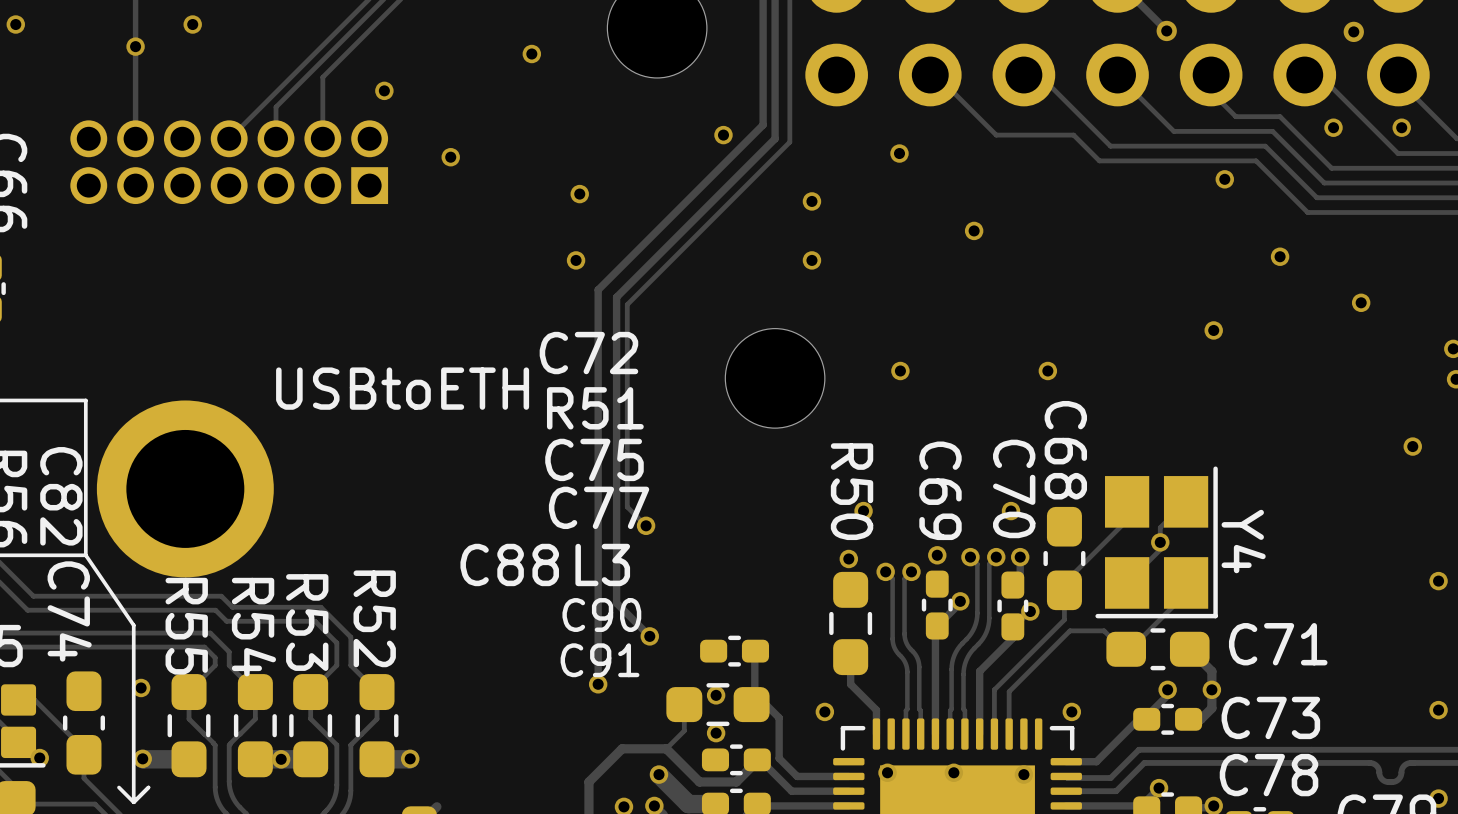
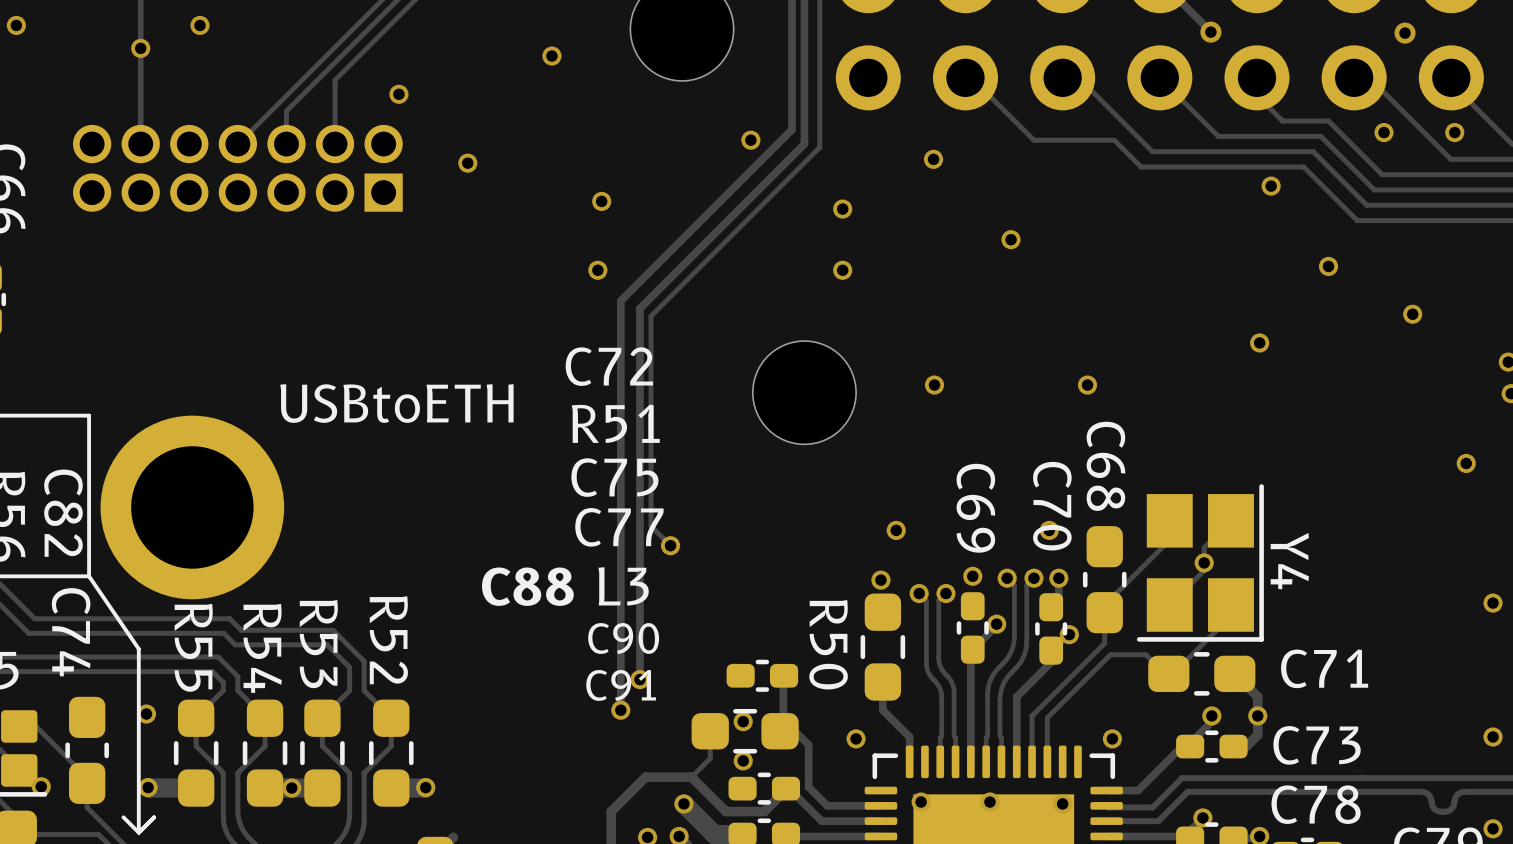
R50 name position: R50 (852, 491) -> R50 (828, 644)
track: (616, 603) (649, 636) -> (639, 626) (639, 679)
via position: (649, 636) -> (639, 679)

